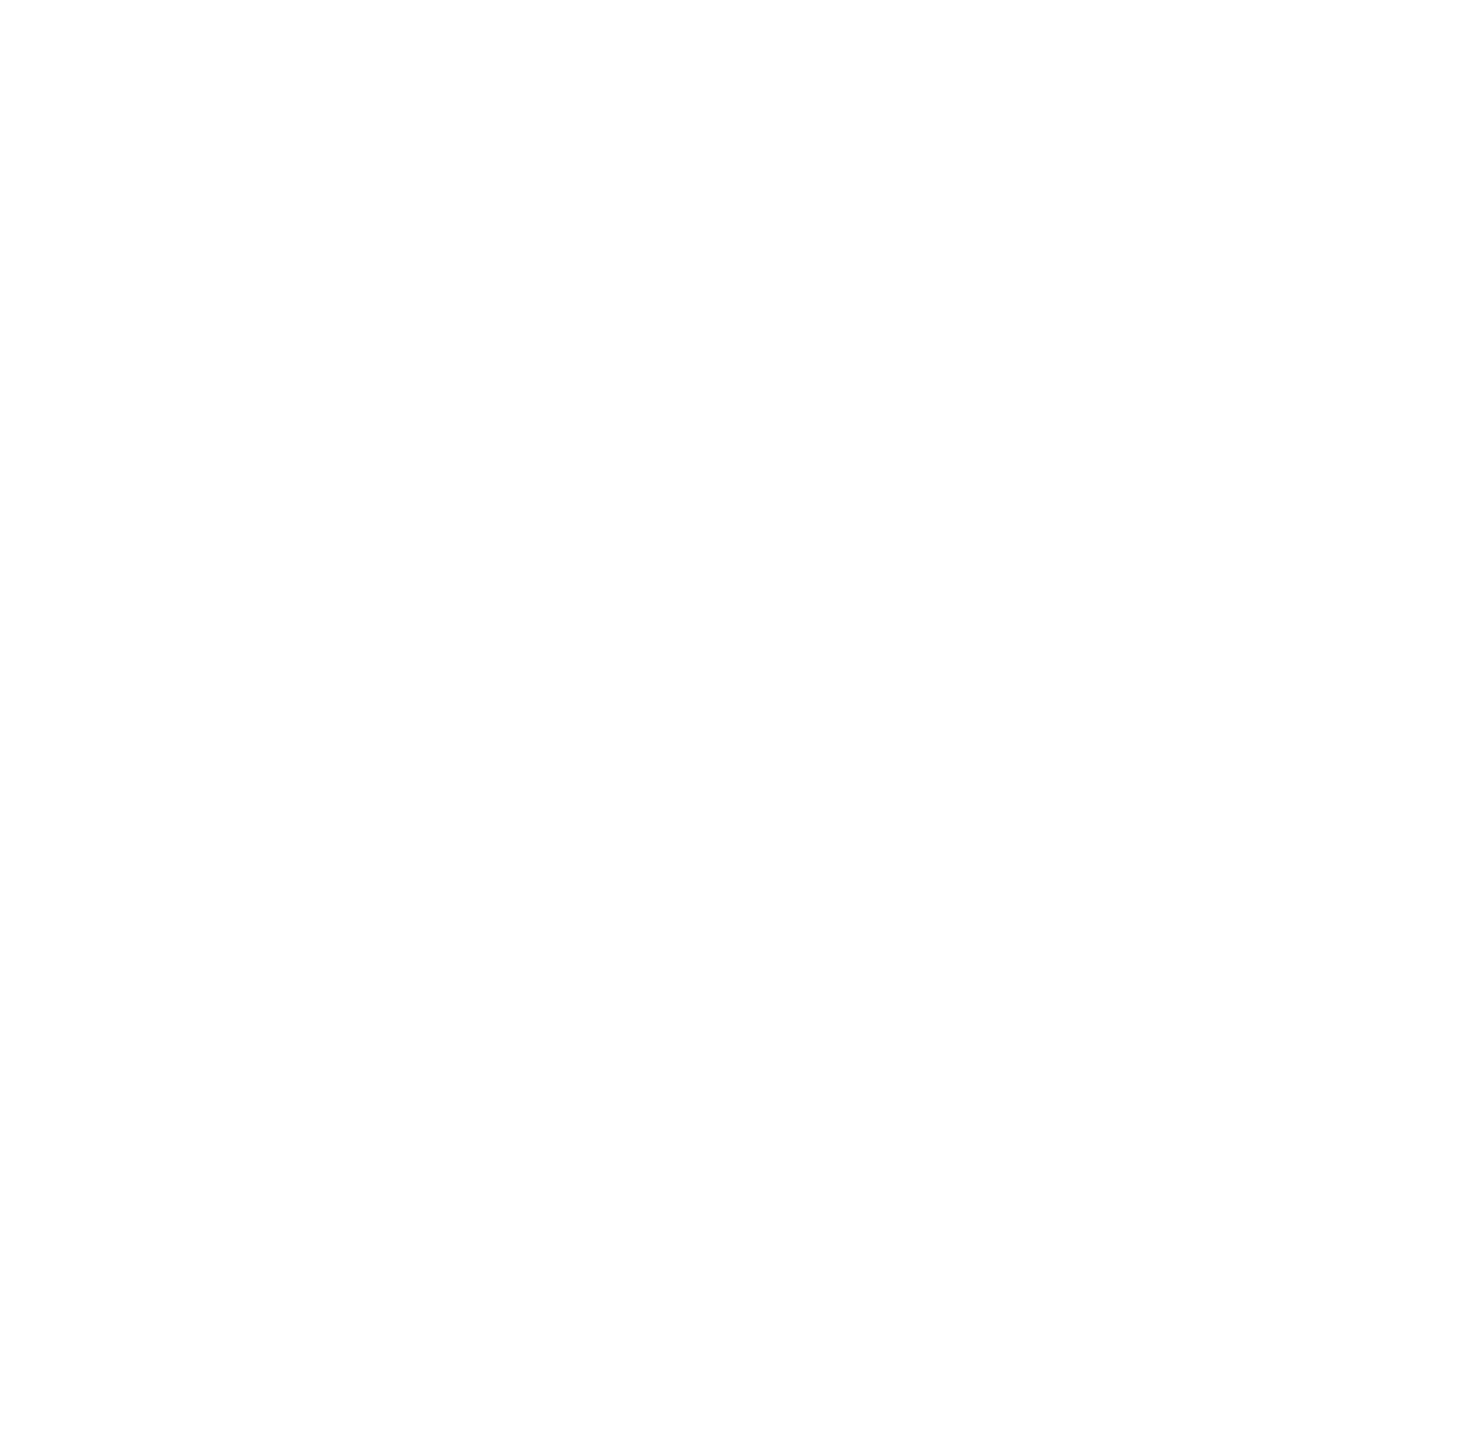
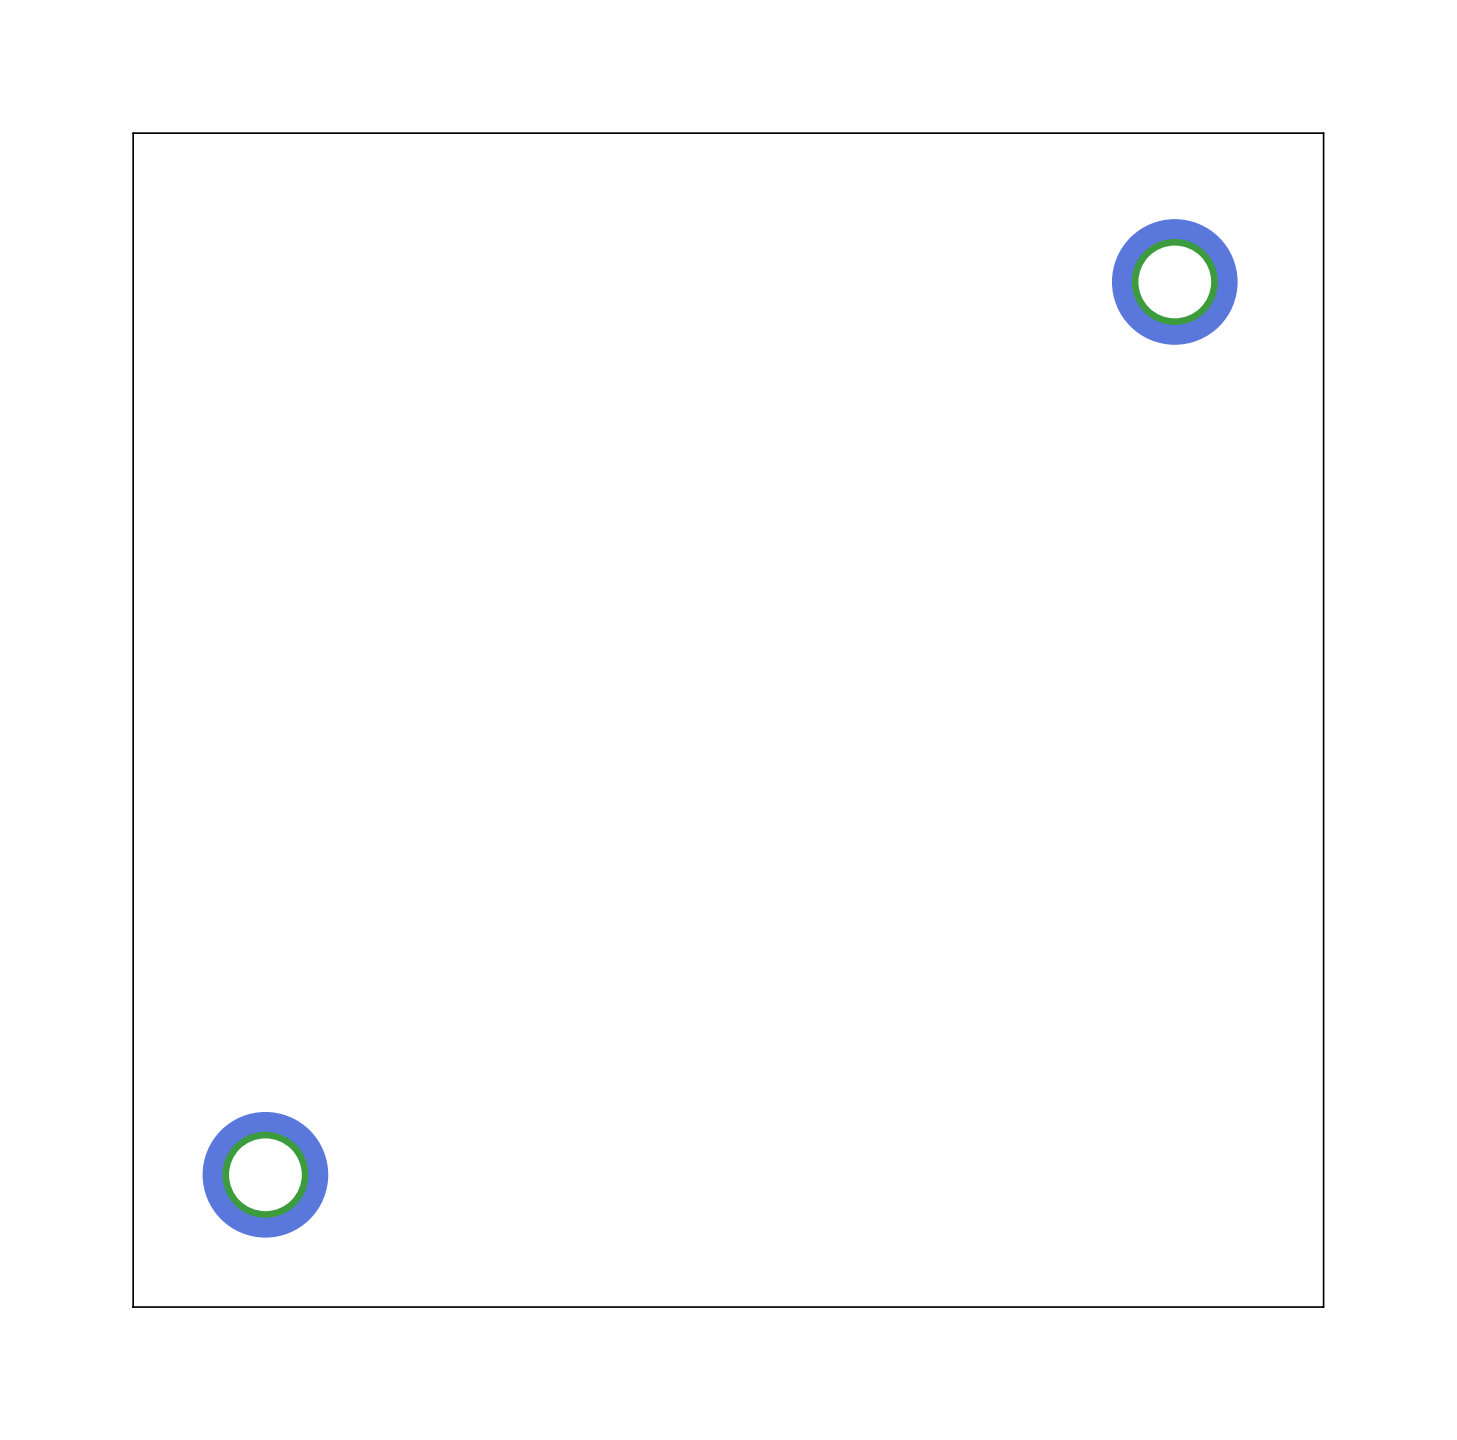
board edge: none -> (1323, 133) (133, 133) (133, 1307) (1323, 1307) (1323, 133)
part: none -> (1174, 281)
part: none -> (265, 1174)

